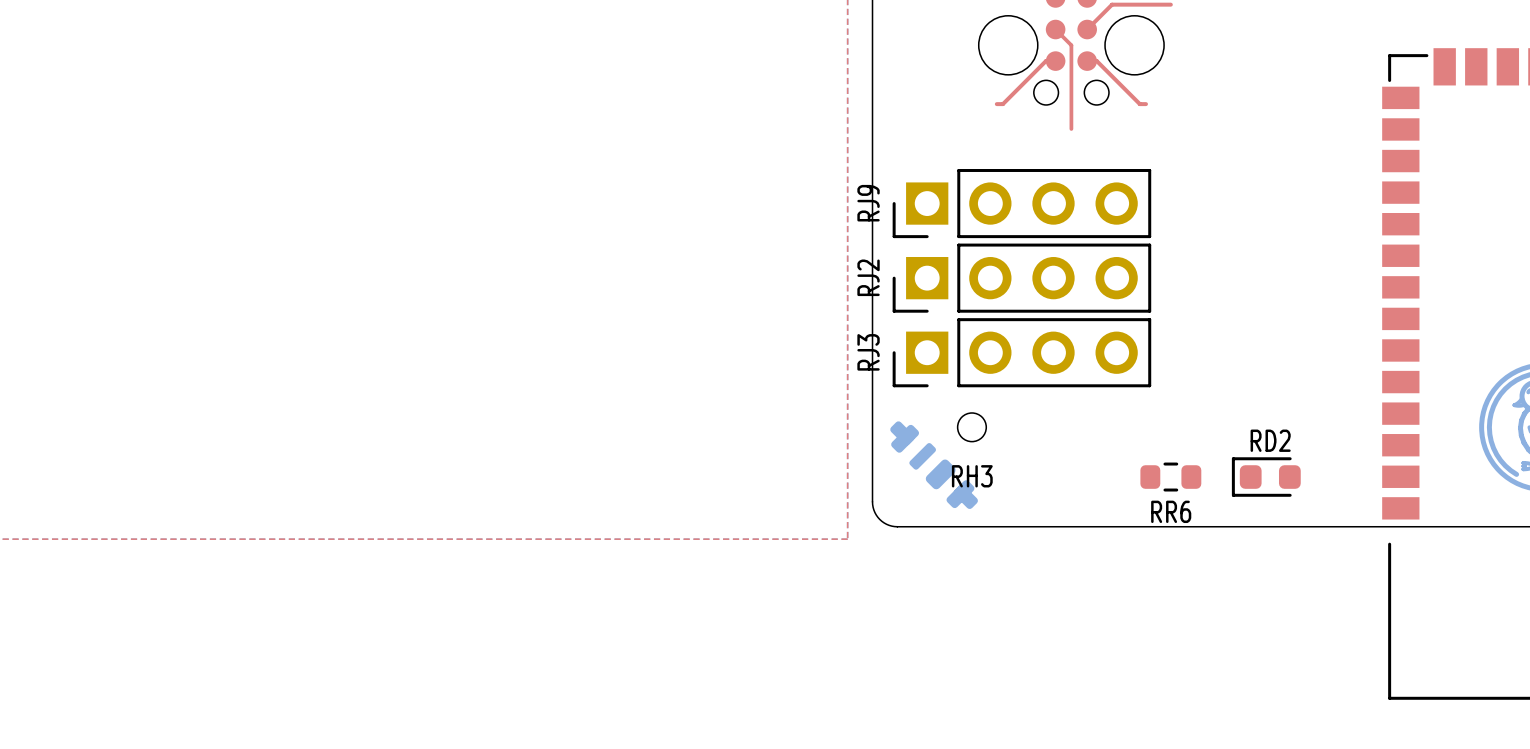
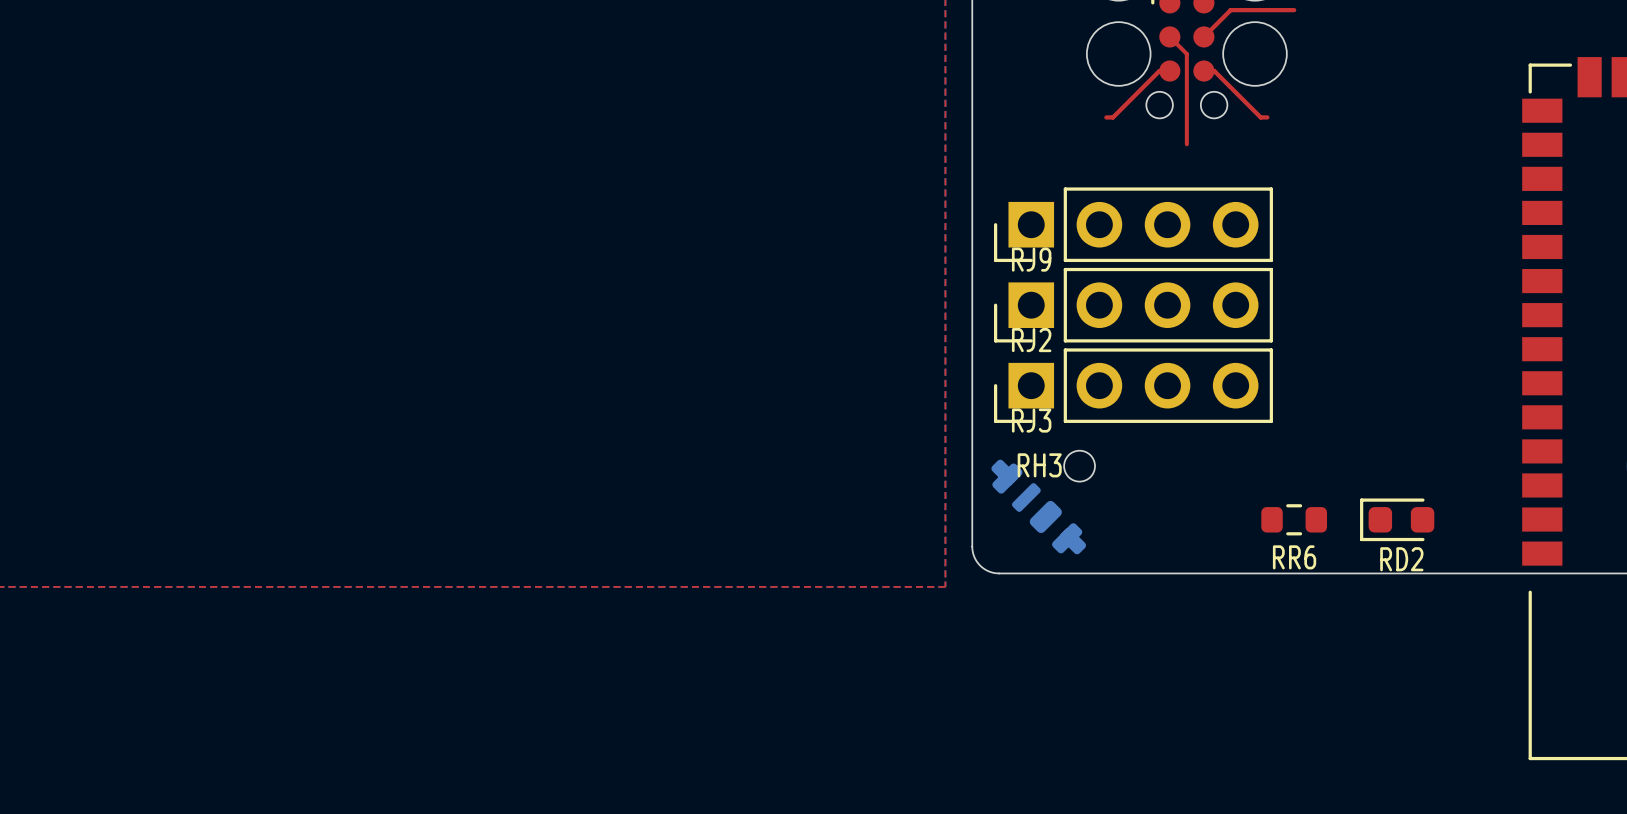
RJ9 name rotation: 0° (868, 203) -> 90° clockwise (1031, 259)
RJ9 name position: RJ9 (868, 203) -> RJ9 (1031, 259)
RJ2 name rotation: 0° (868, 277) -> 90° clockwise (1031, 340)
RJ2 name position: RJ2 (868, 277) -> RJ2 (1031, 340)
RJ3 name rotation: 0° (868, 352) -> 90° clockwise (1031, 420)
RJ3 name position: RJ3 (868, 352) -> RJ3 (1031, 420)
RD2 name position: RD2 (1270, 440) -> RD2 (1401, 559)
RH3 name position: RH3 (972, 476) -> RH3 (1039, 465)

